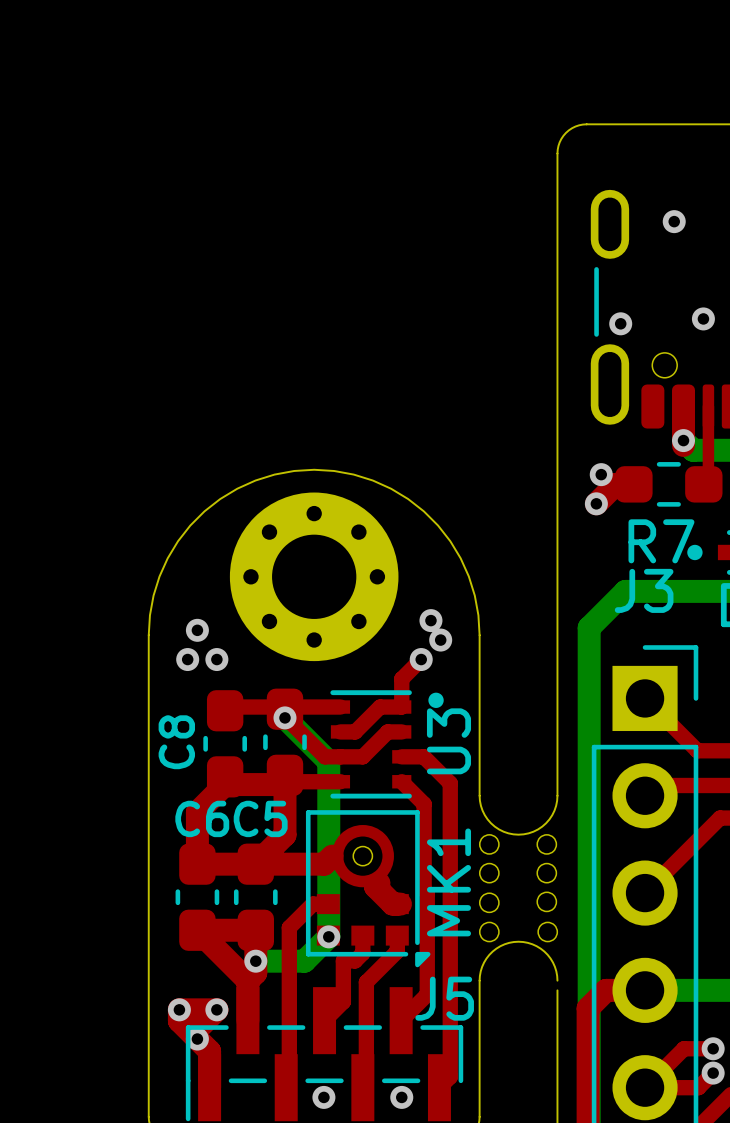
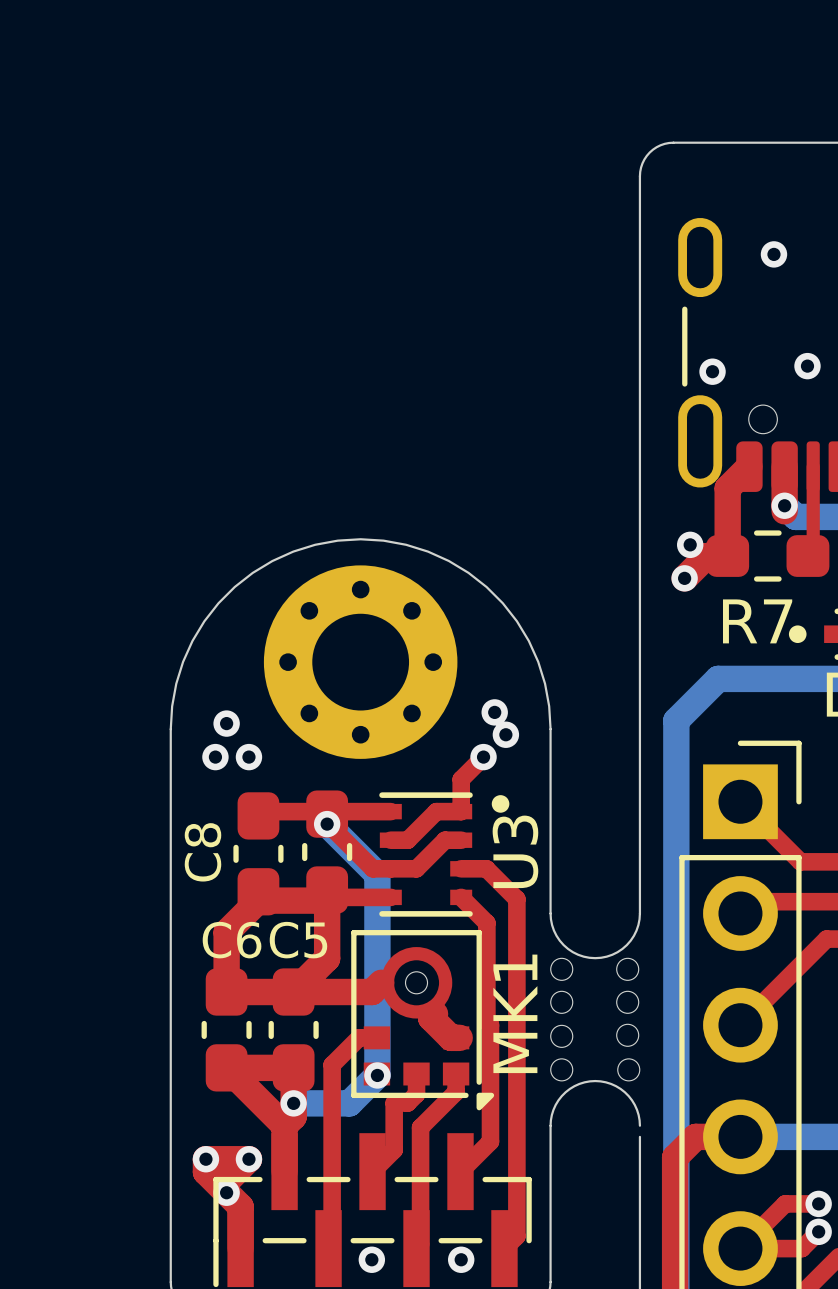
top track: none -> (749, 466) (727, 488) (727, 556)
J3 name: J3 (644, 590) -> none
J5 name: J5 (444, 998) -> none

